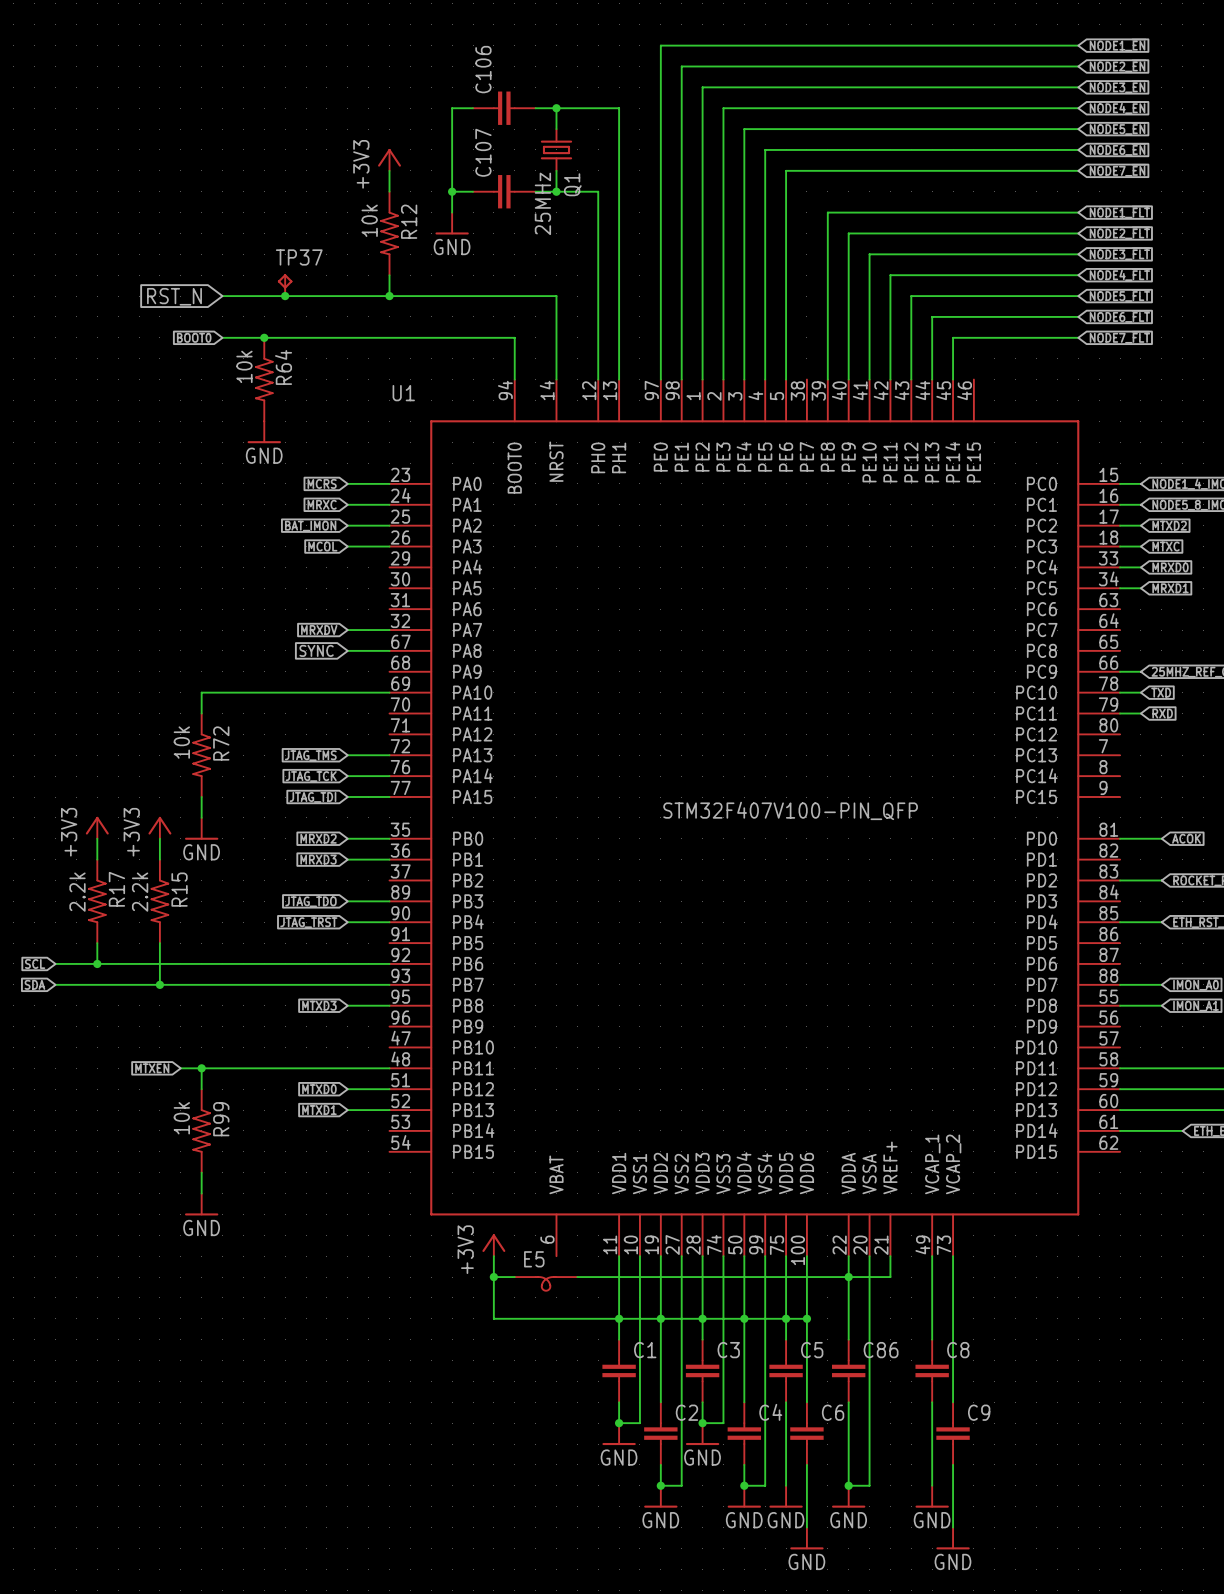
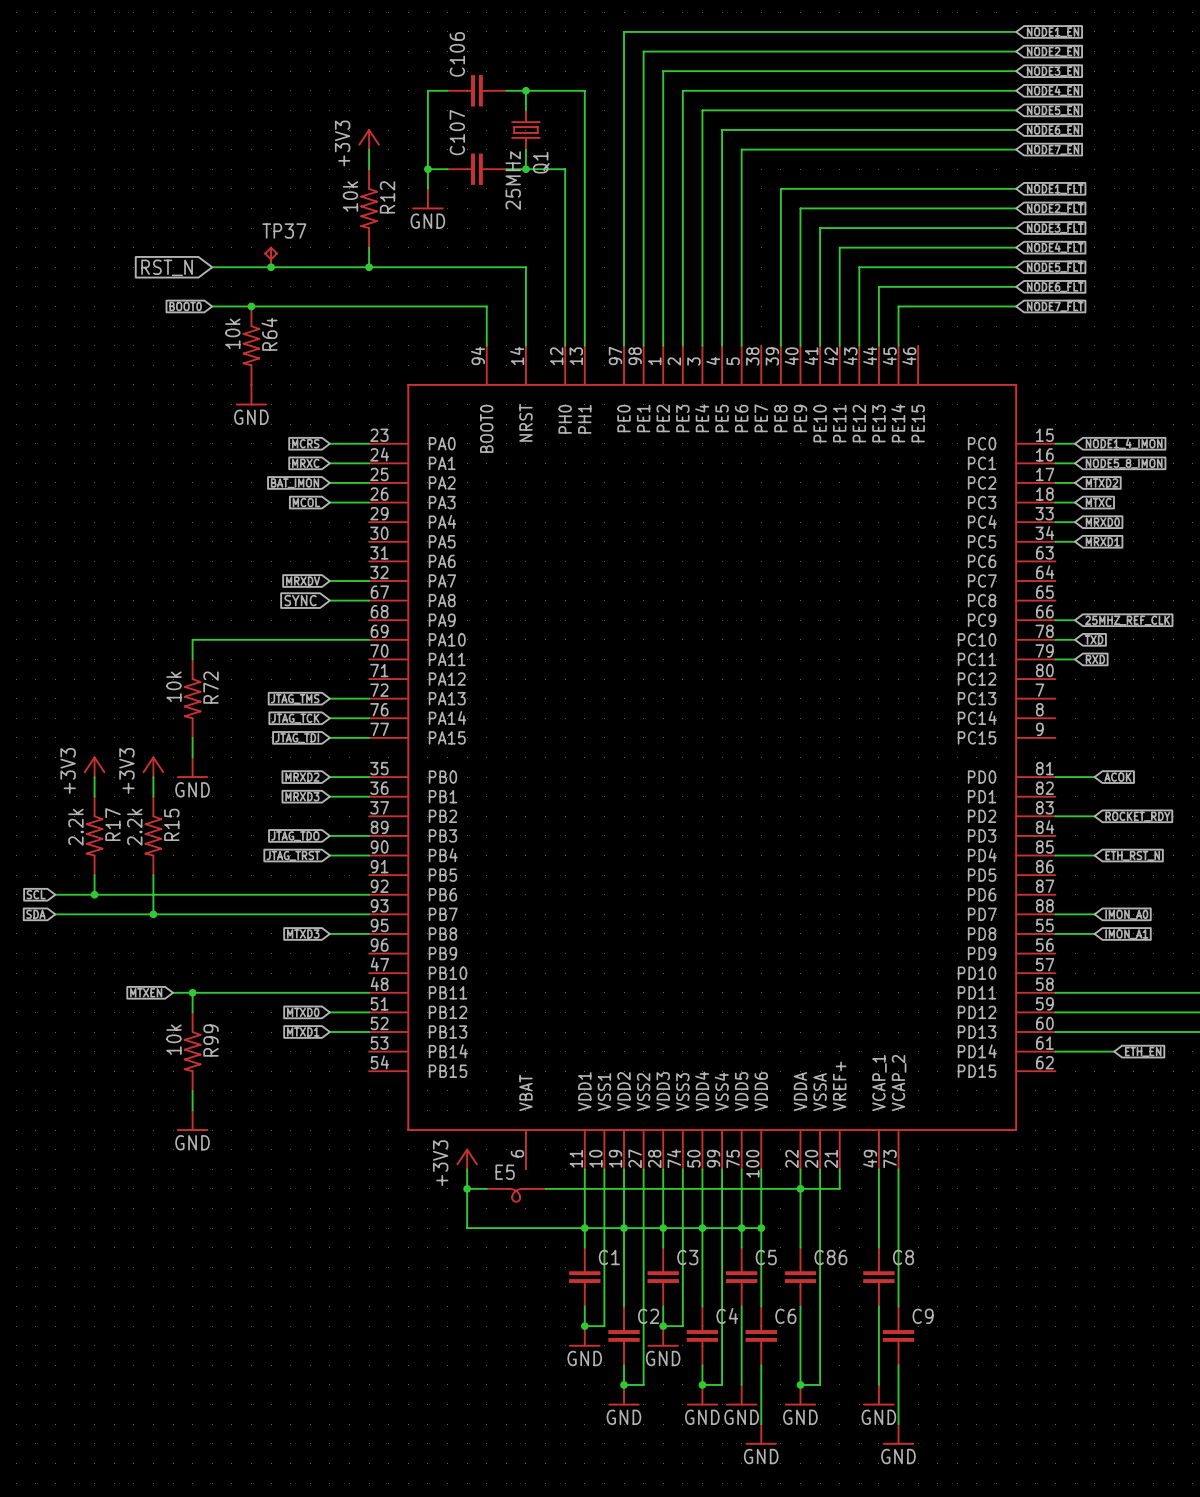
U1 name: U1 (403, 393) -> none
U1 value: STM32F407V100-PIN_QFP (790, 810) -> none

